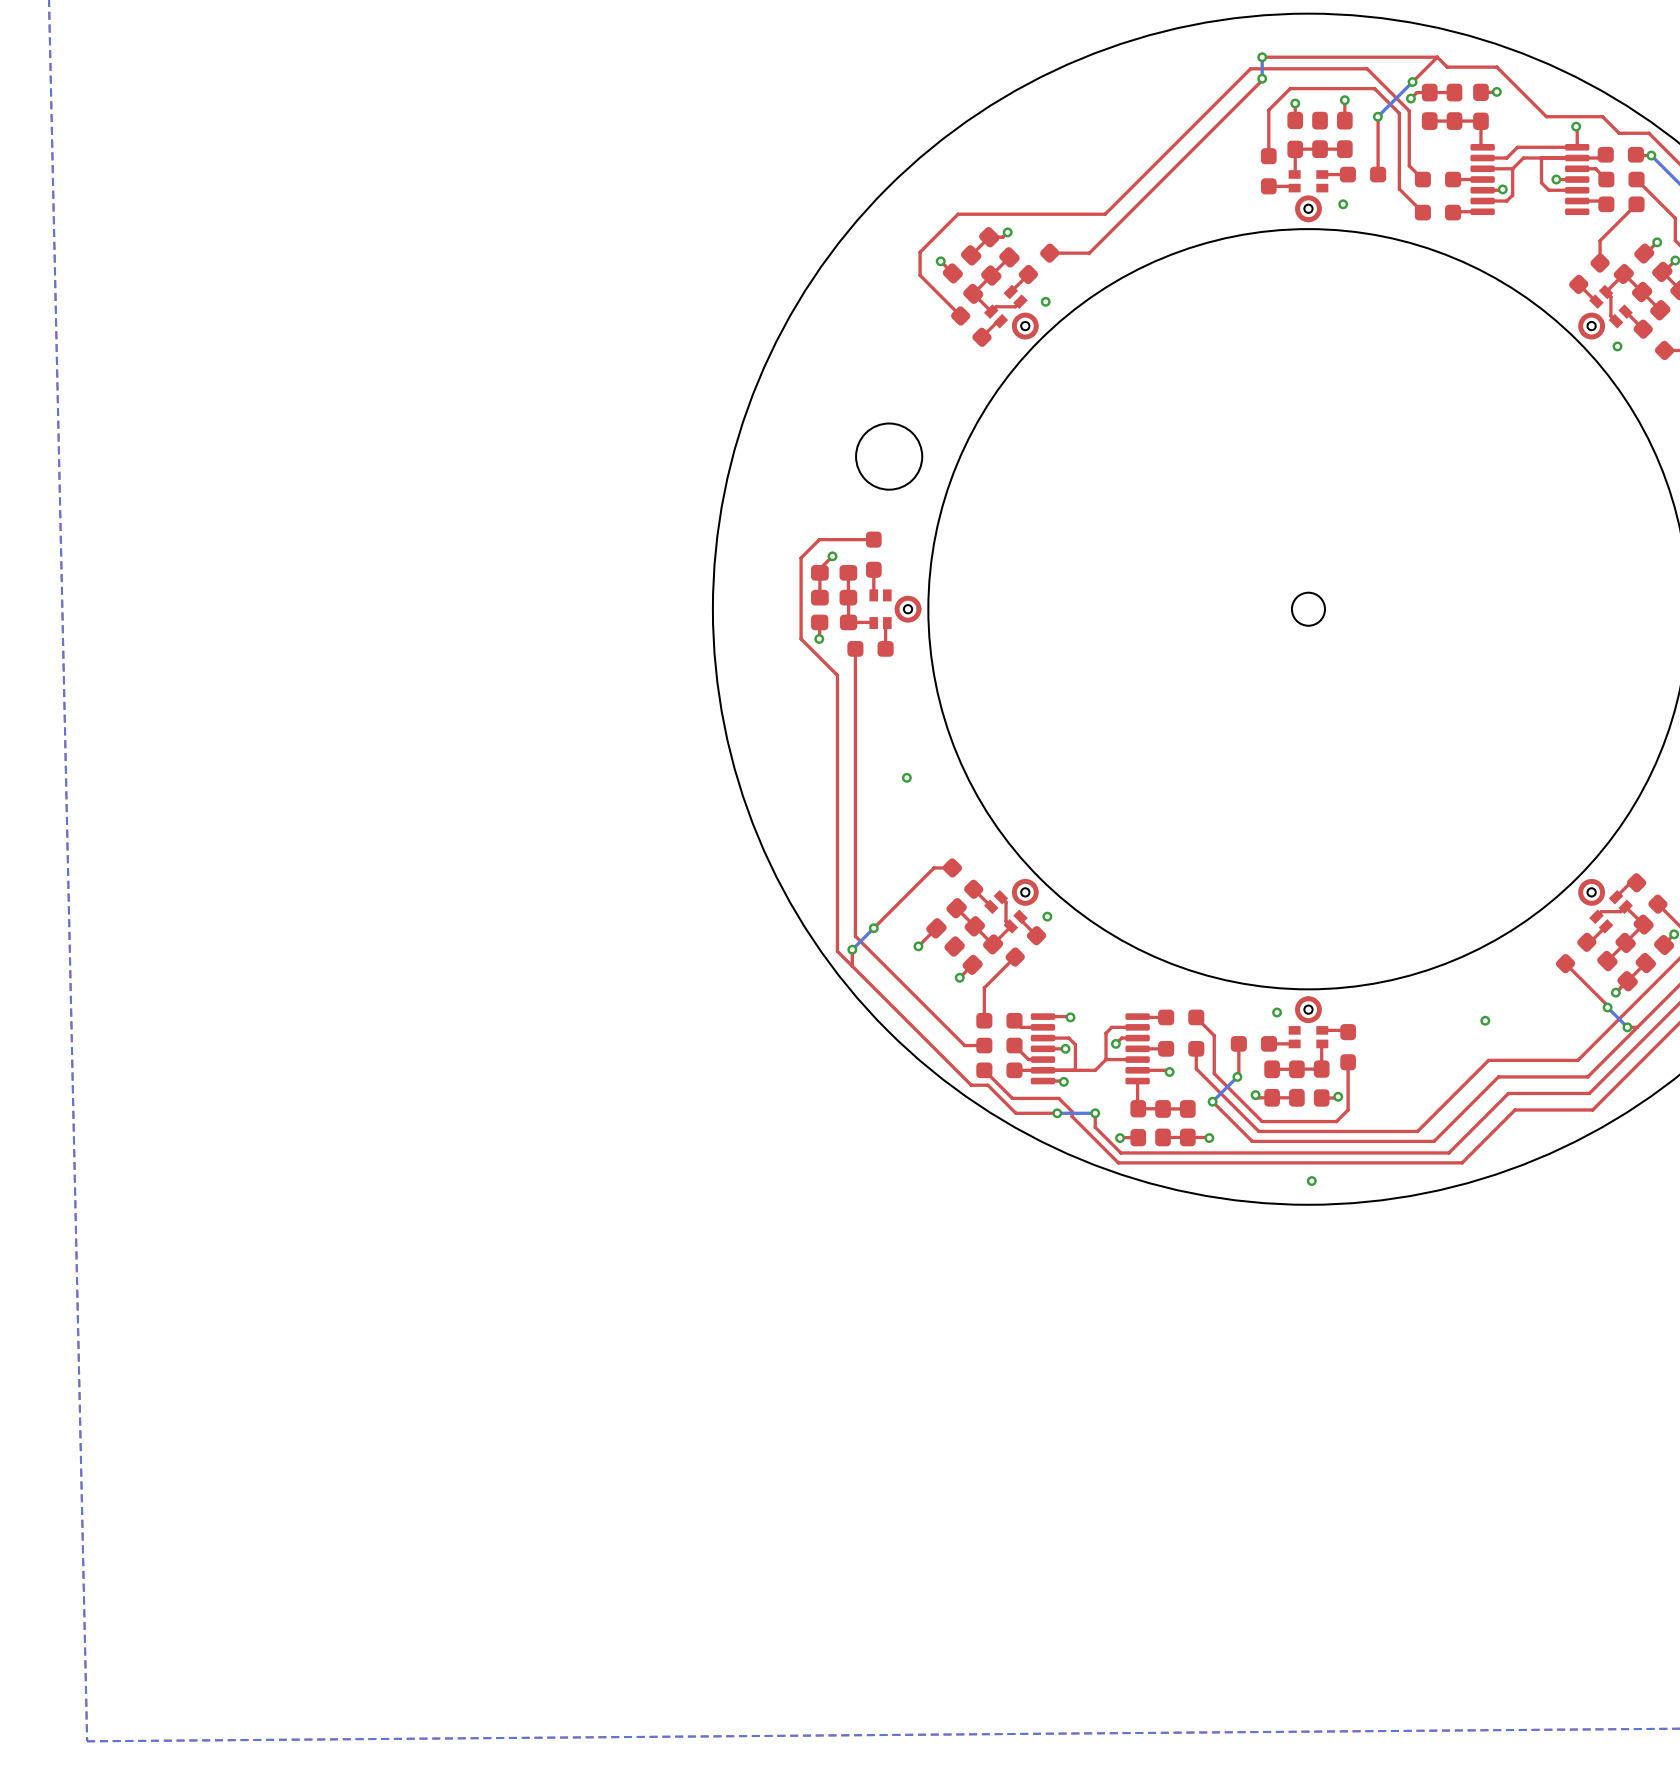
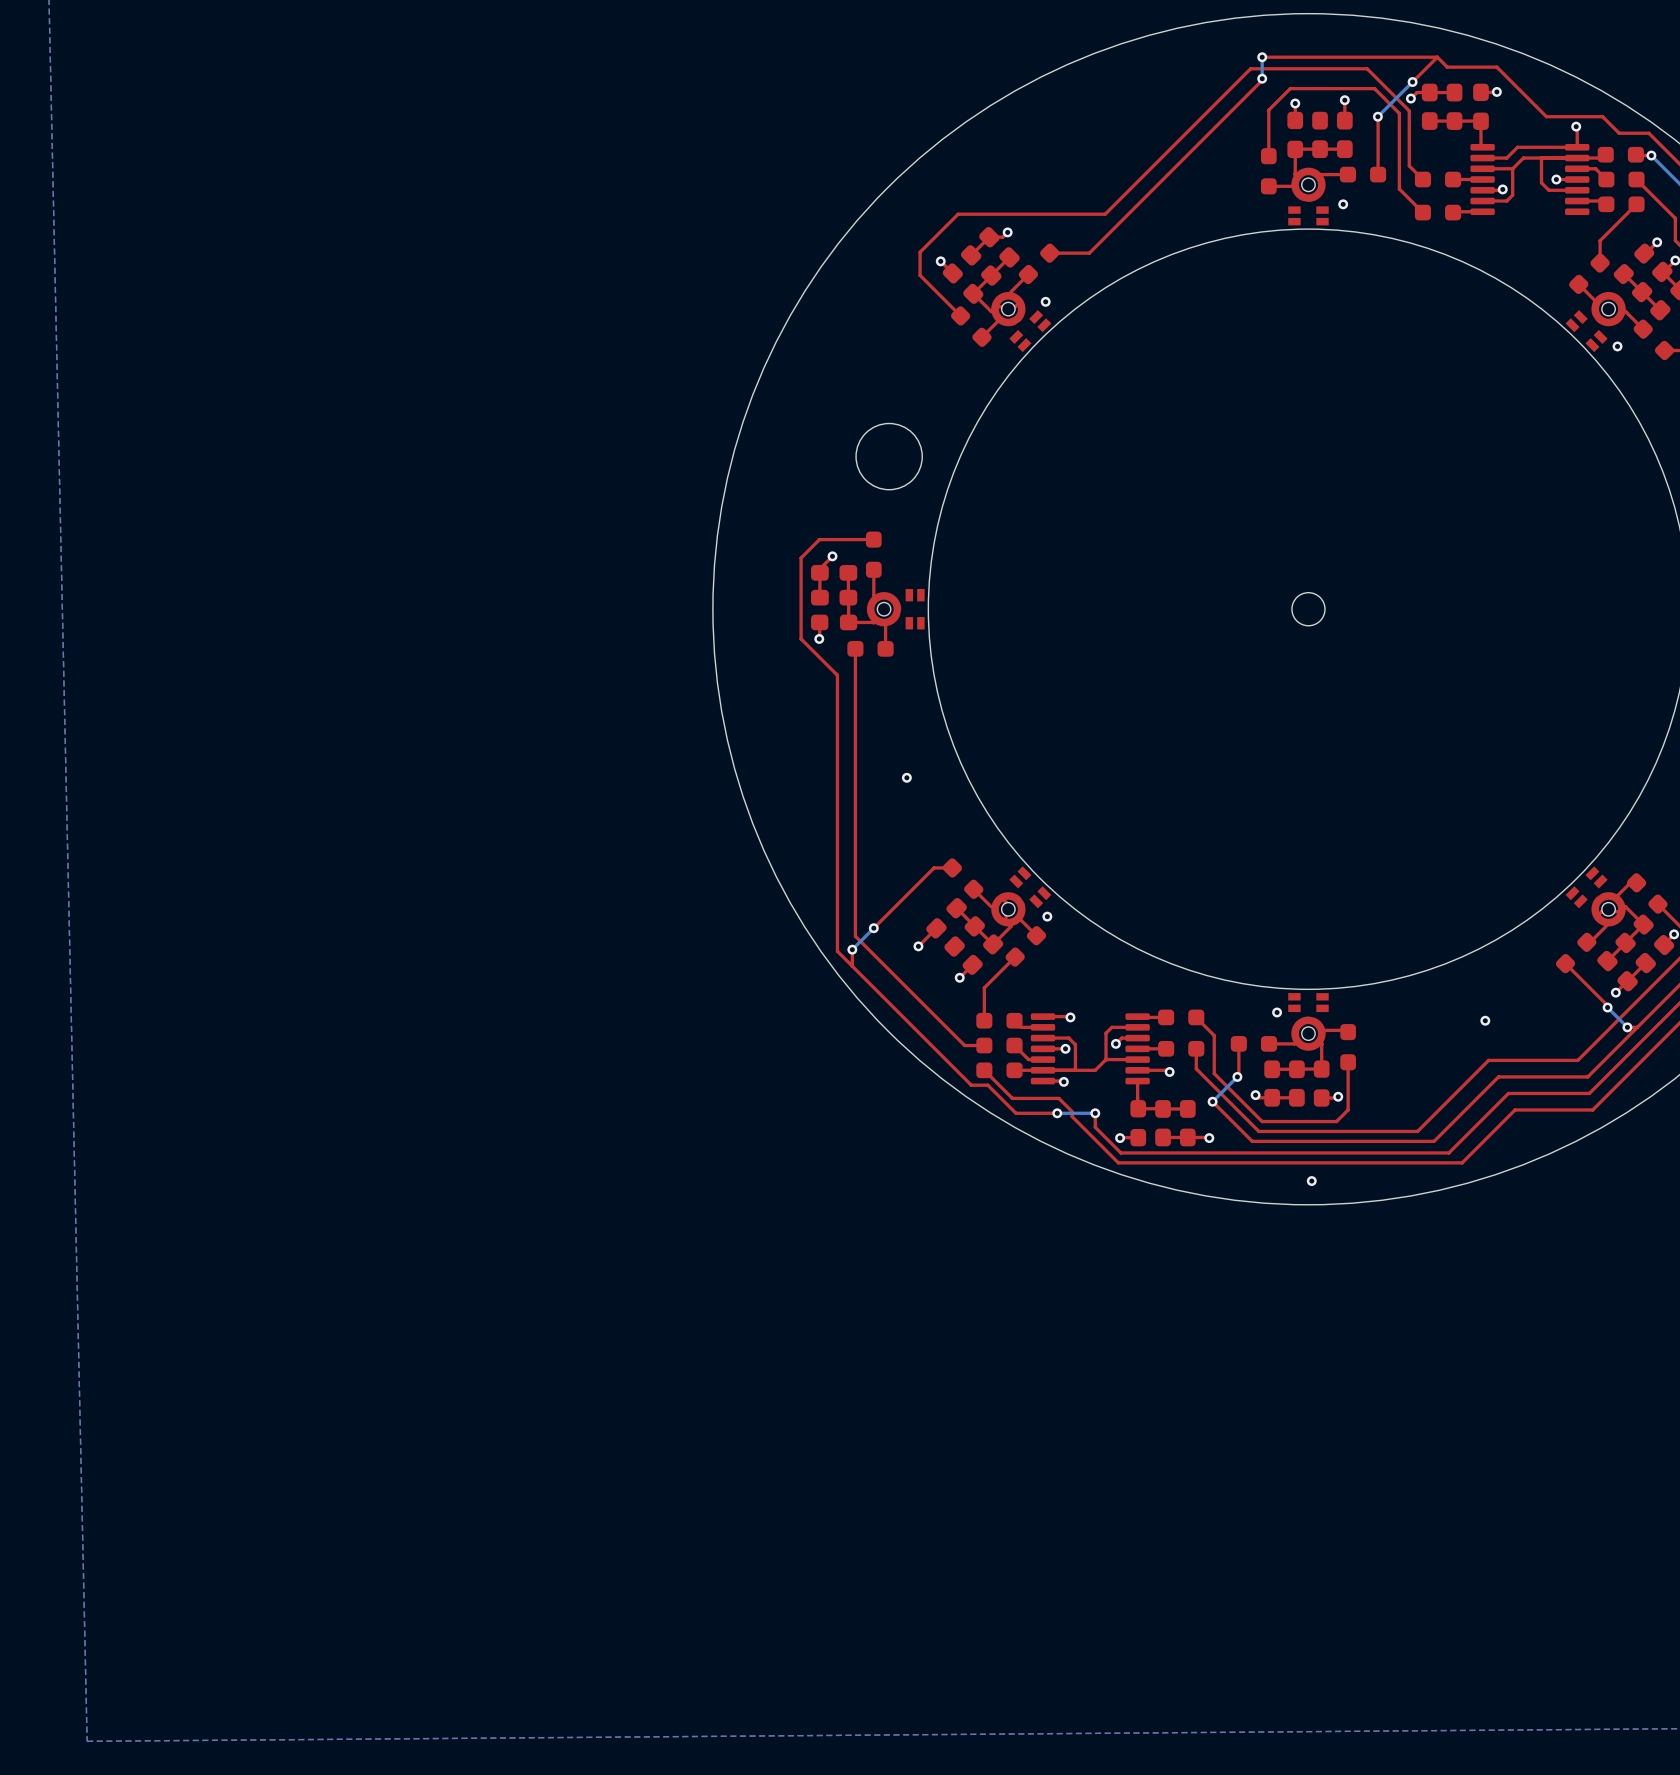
part footprint: [1288, 170, 1329, 223] -> [1288, 167, 1329, 226]
top track: (1623, 274) (1606, 292) (1610, 296) (1610, 316) (1616, 321) -> none
part footprint: [984, 284, 1039, 340] -> [991, 291, 1052, 353]
part footprint: [1578, 284, 1633, 340] -> [1565, 291, 1626, 353]
part footprint: [869, 589, 922, 630] -> [866, 588, 925, 630]
part footprint: [984, 878, 1039, 934] -> [991, 866, 1052, 927]
part footprint: [1578, 878, 1633, 934] -> [1565, 866, 1626, 927]
part footprint: [1288, 996, 1329, 1049] -> [1288, 993, 1329, 1051]

